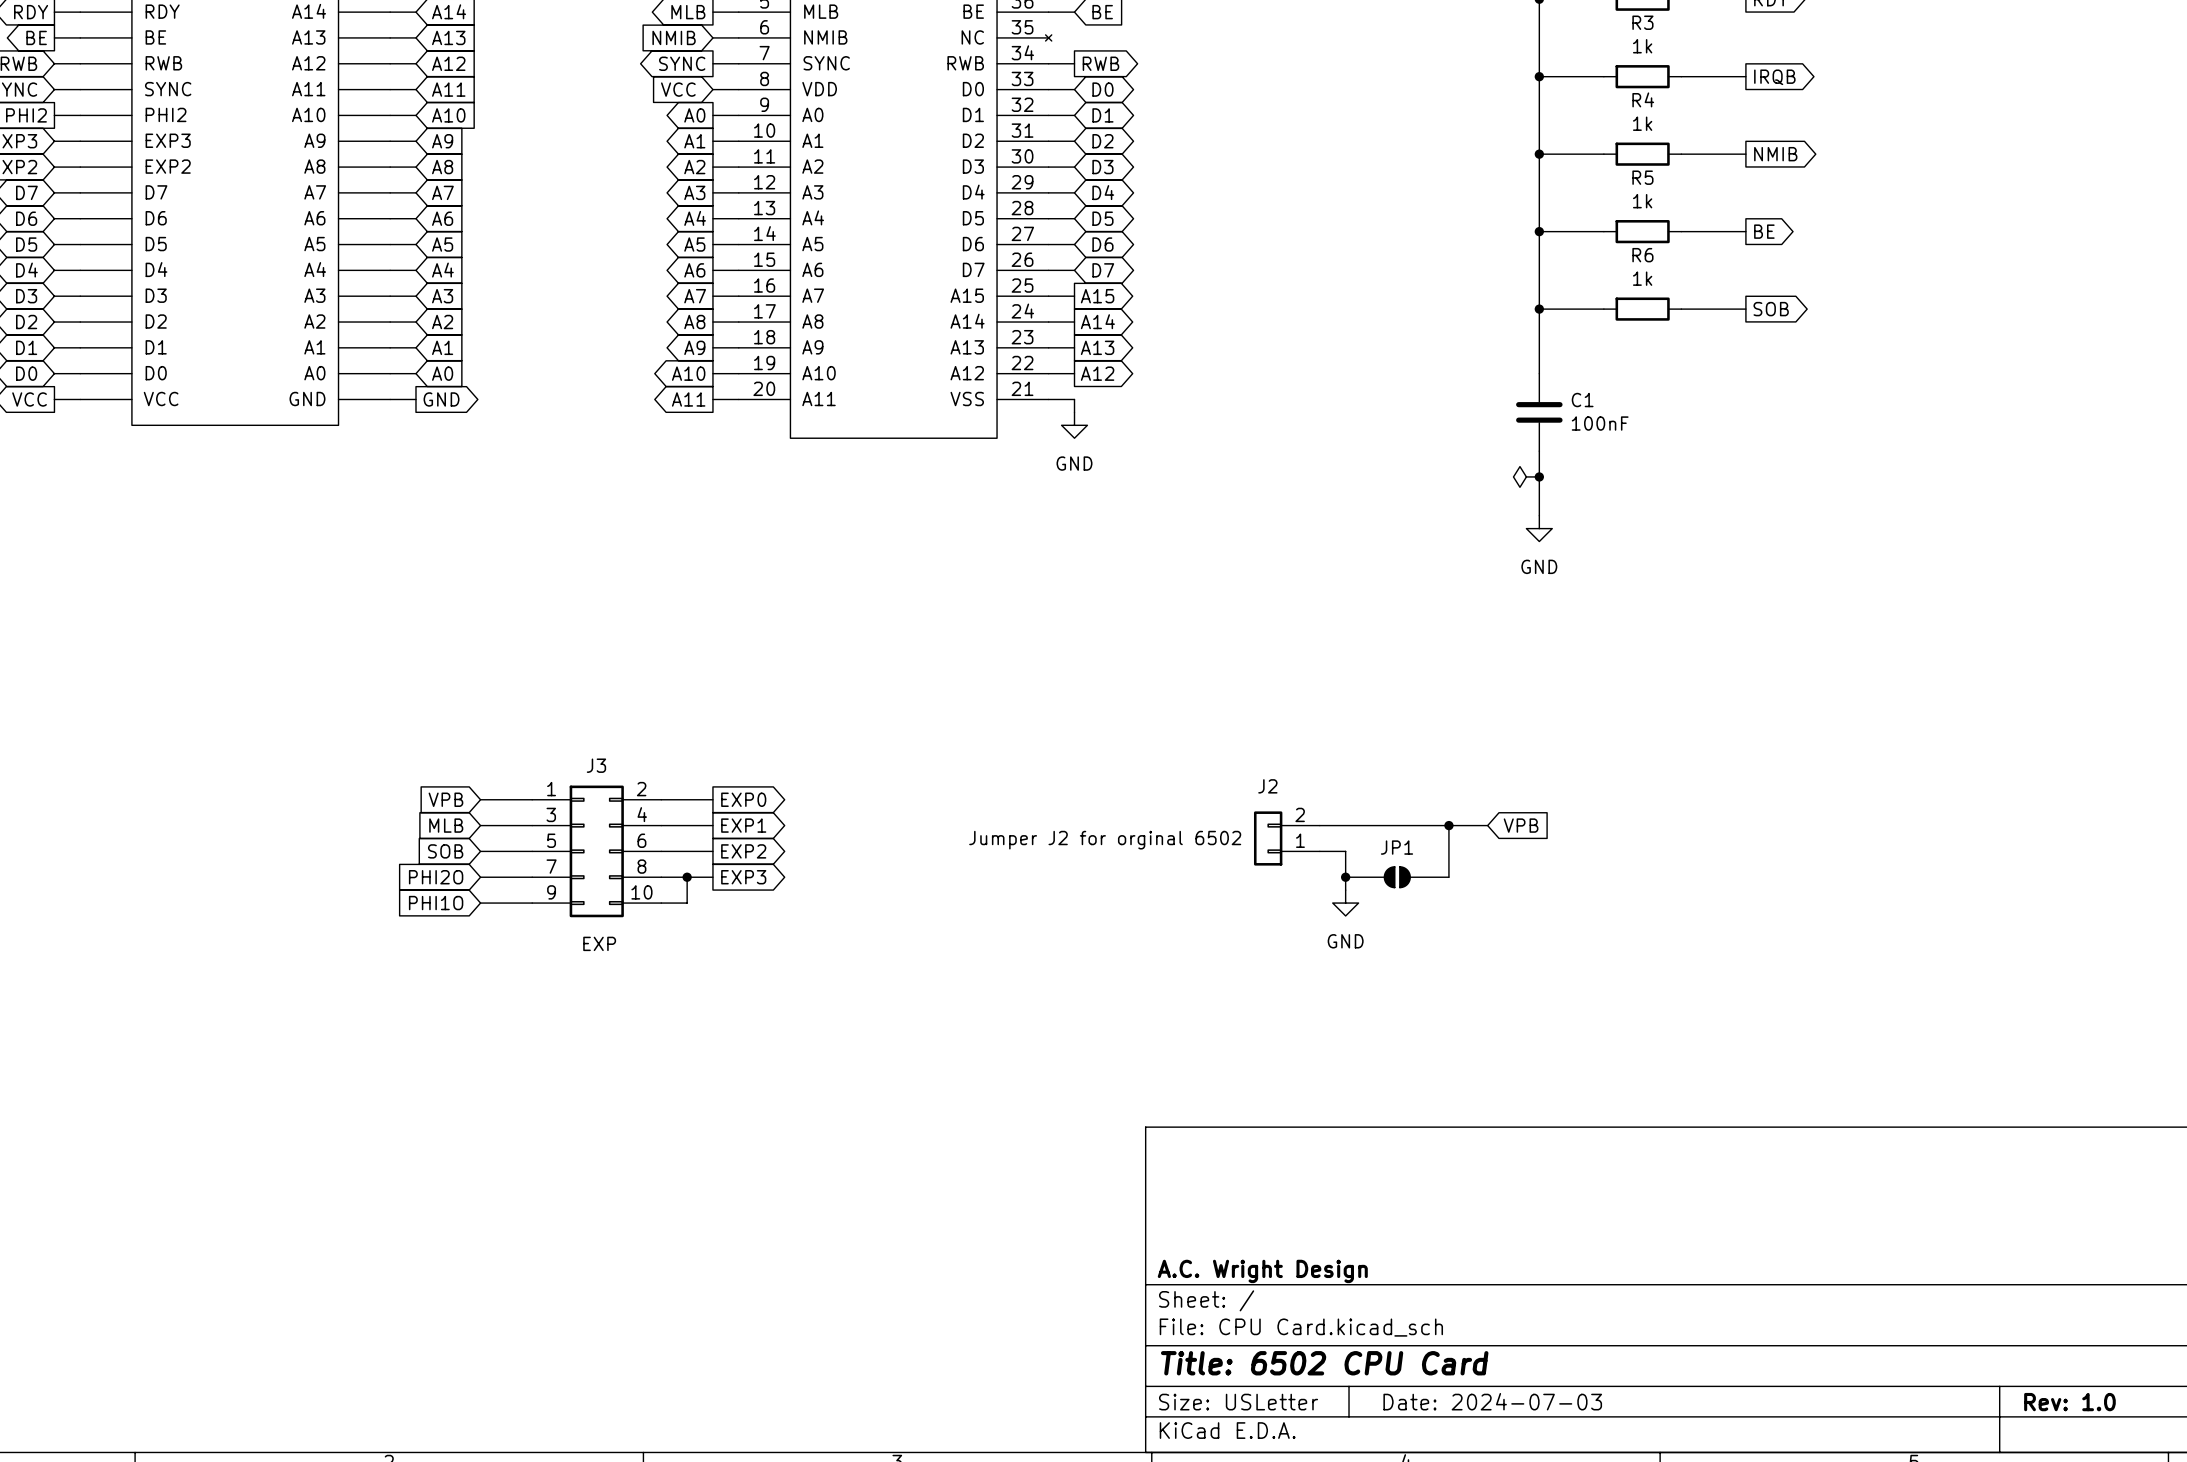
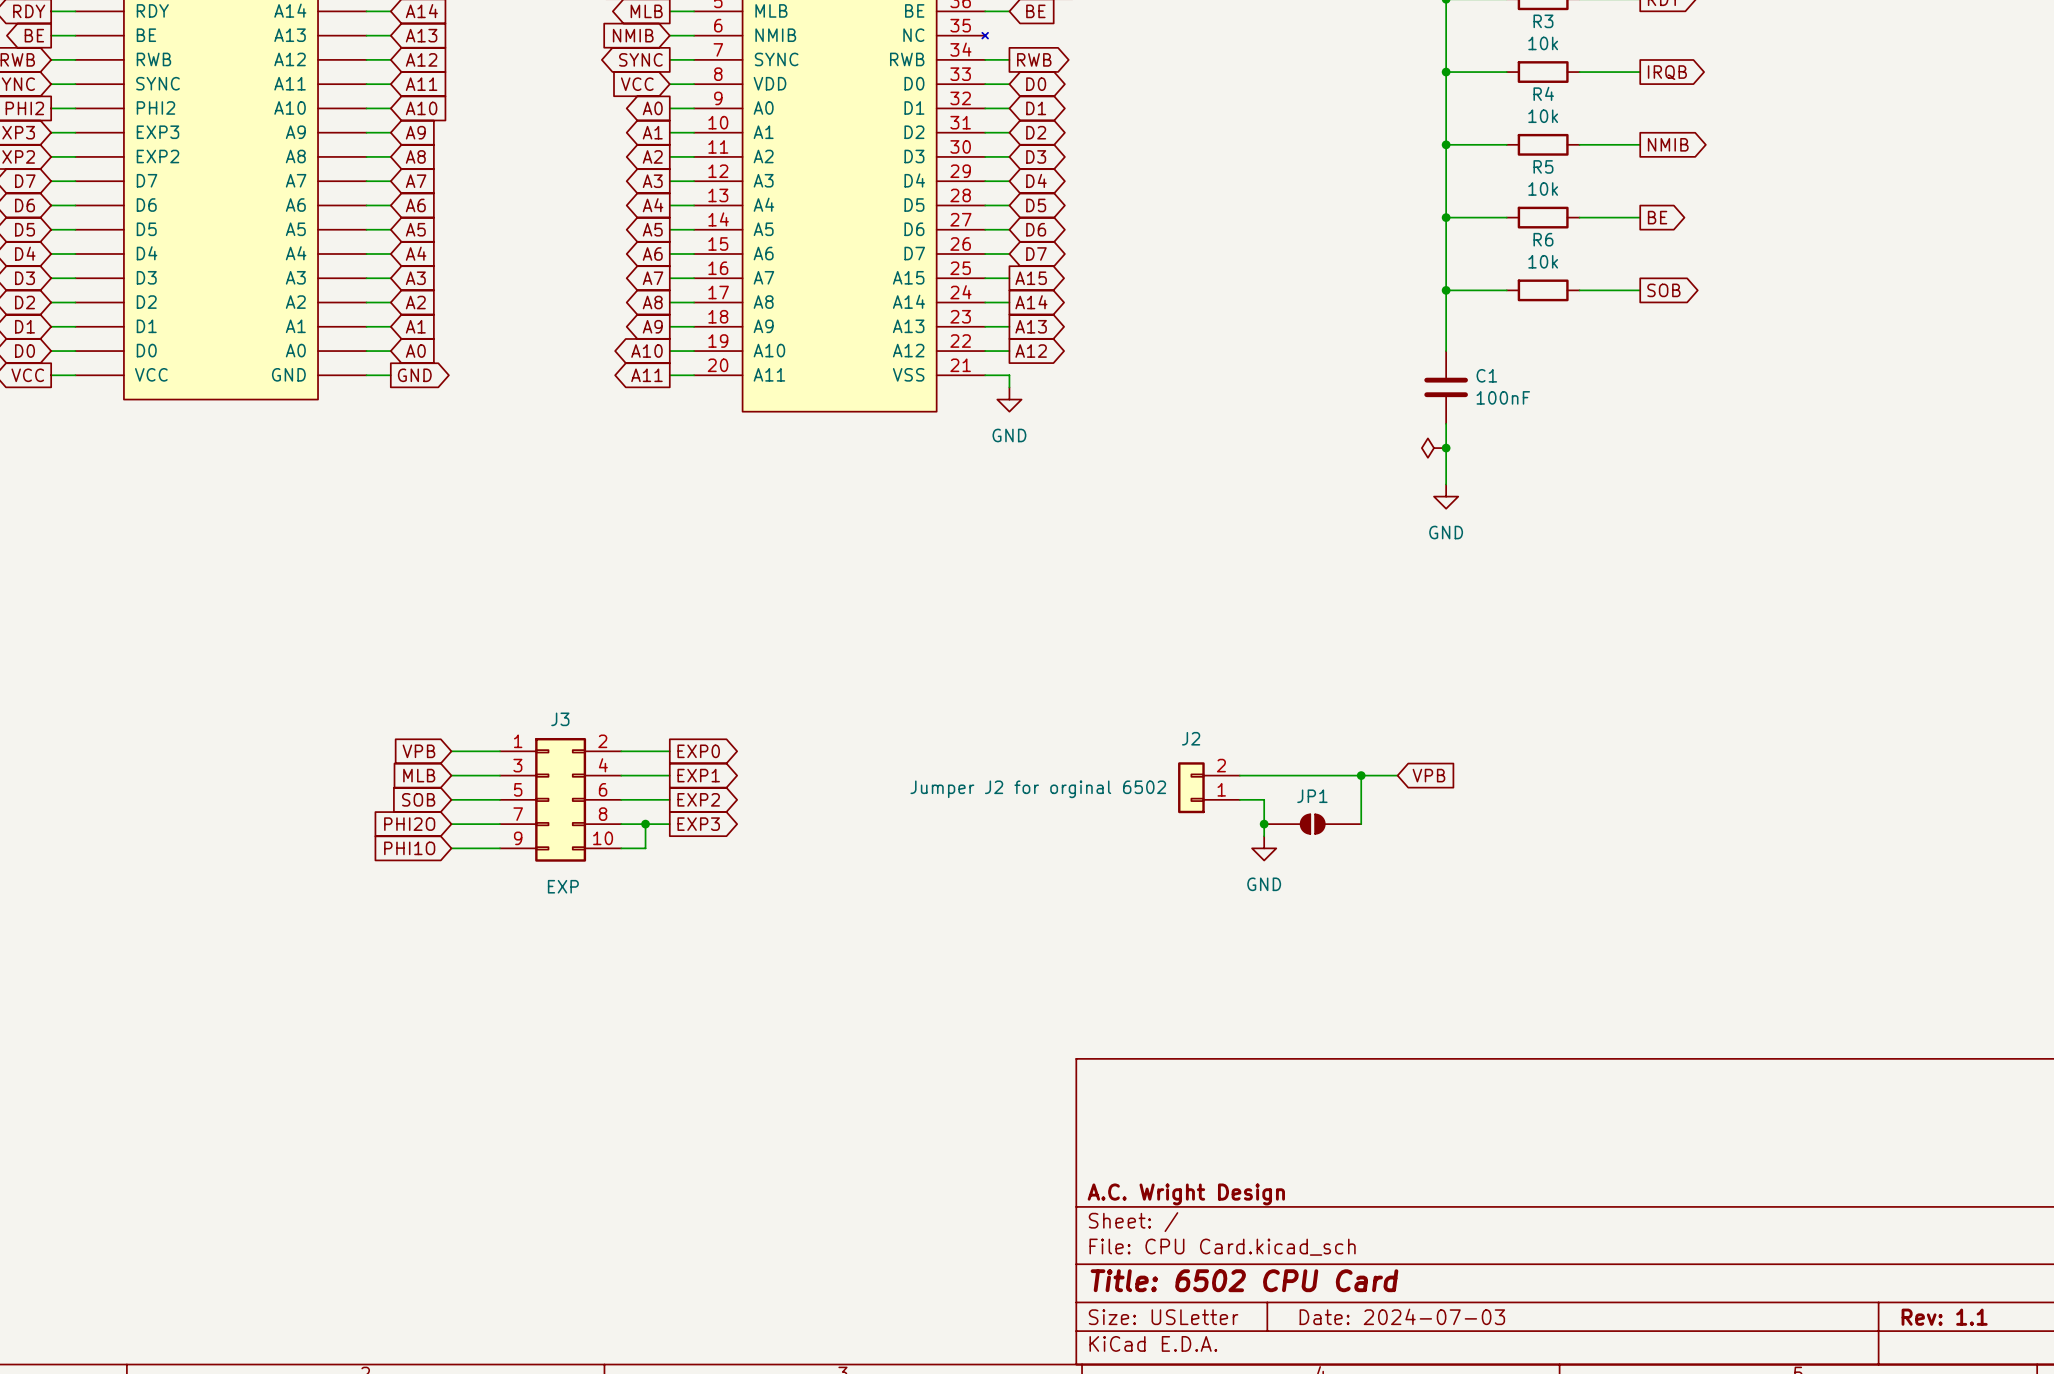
R3 value: 1k (1642, 46) -> 10k (1543, 43)
R4 value: 1k (1642, 123) -> 10k (1543, 116)
R5 value: 1k (1642, 201) -> 10k (1543, 189)
R6 value: 1k (1642, 278) -> 10k (1543, 261)
title block: Rev: 1.0 (2069, 1402) -> Rev: 1.1 (1944, 1317)

